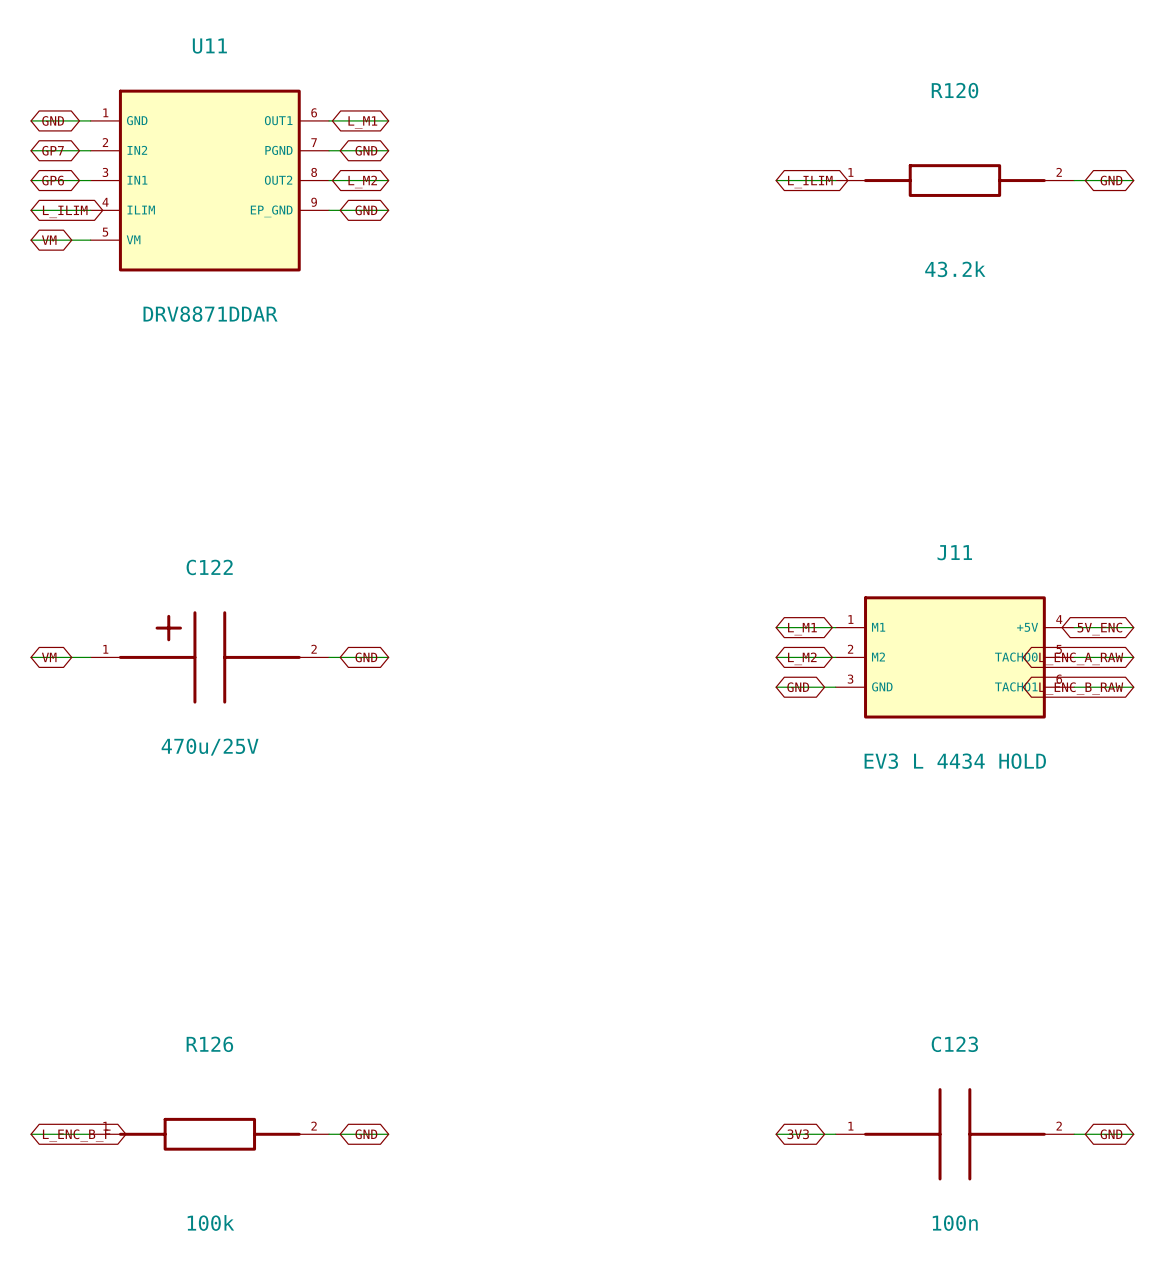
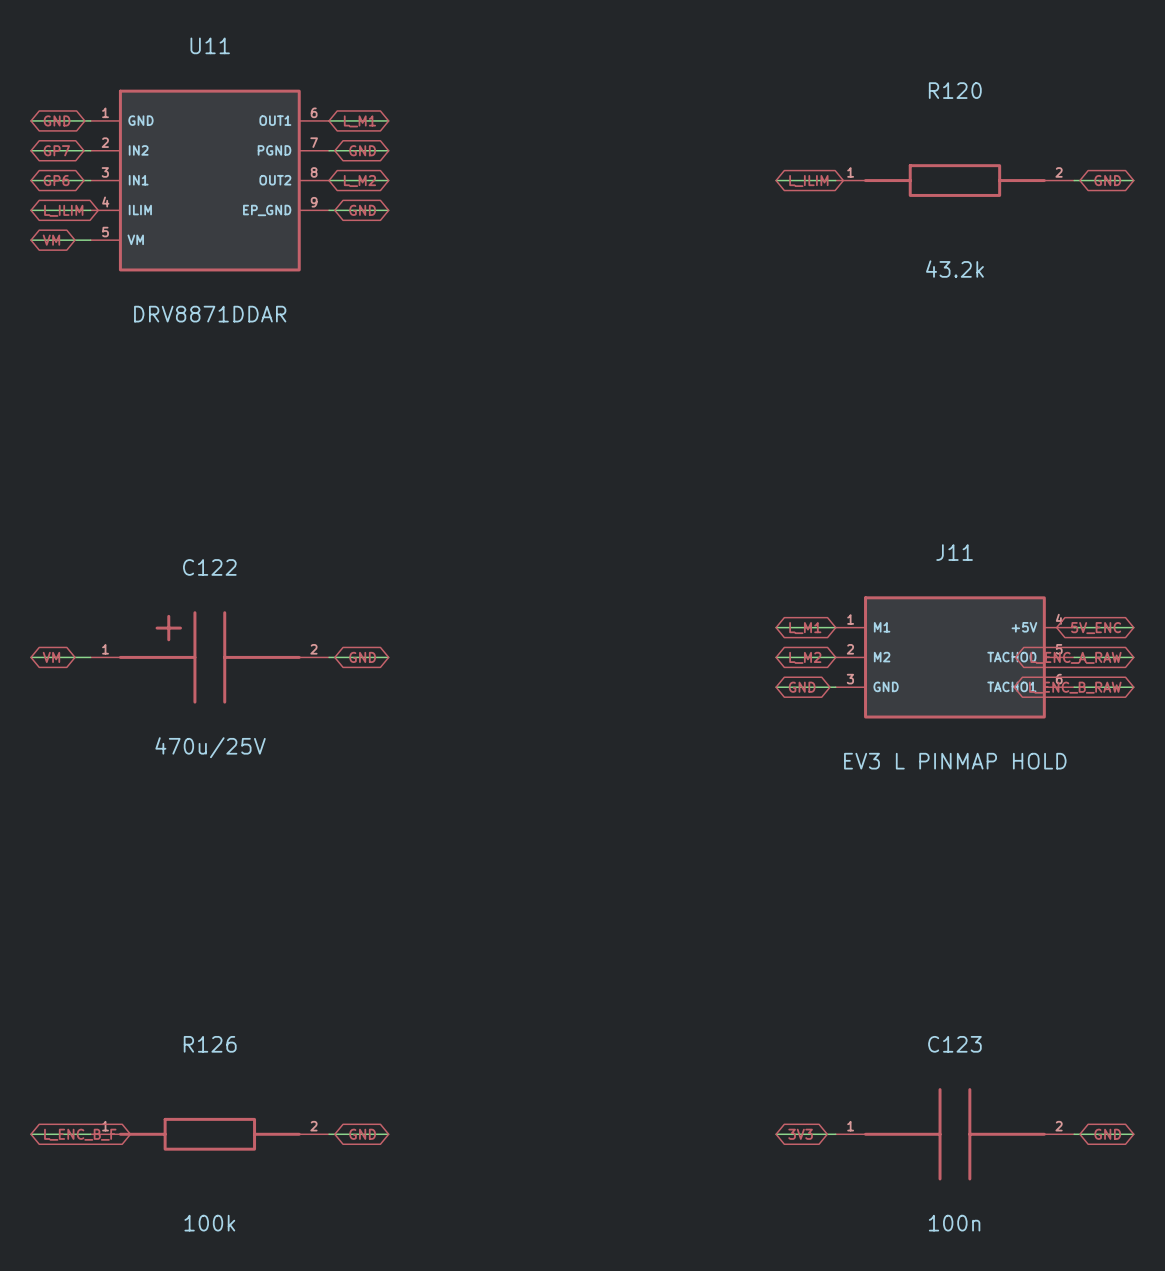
J11 value: EV3 L 4434 HOLD (955, 761) -> EV3 L PINMAP HOLD (955, 761)

